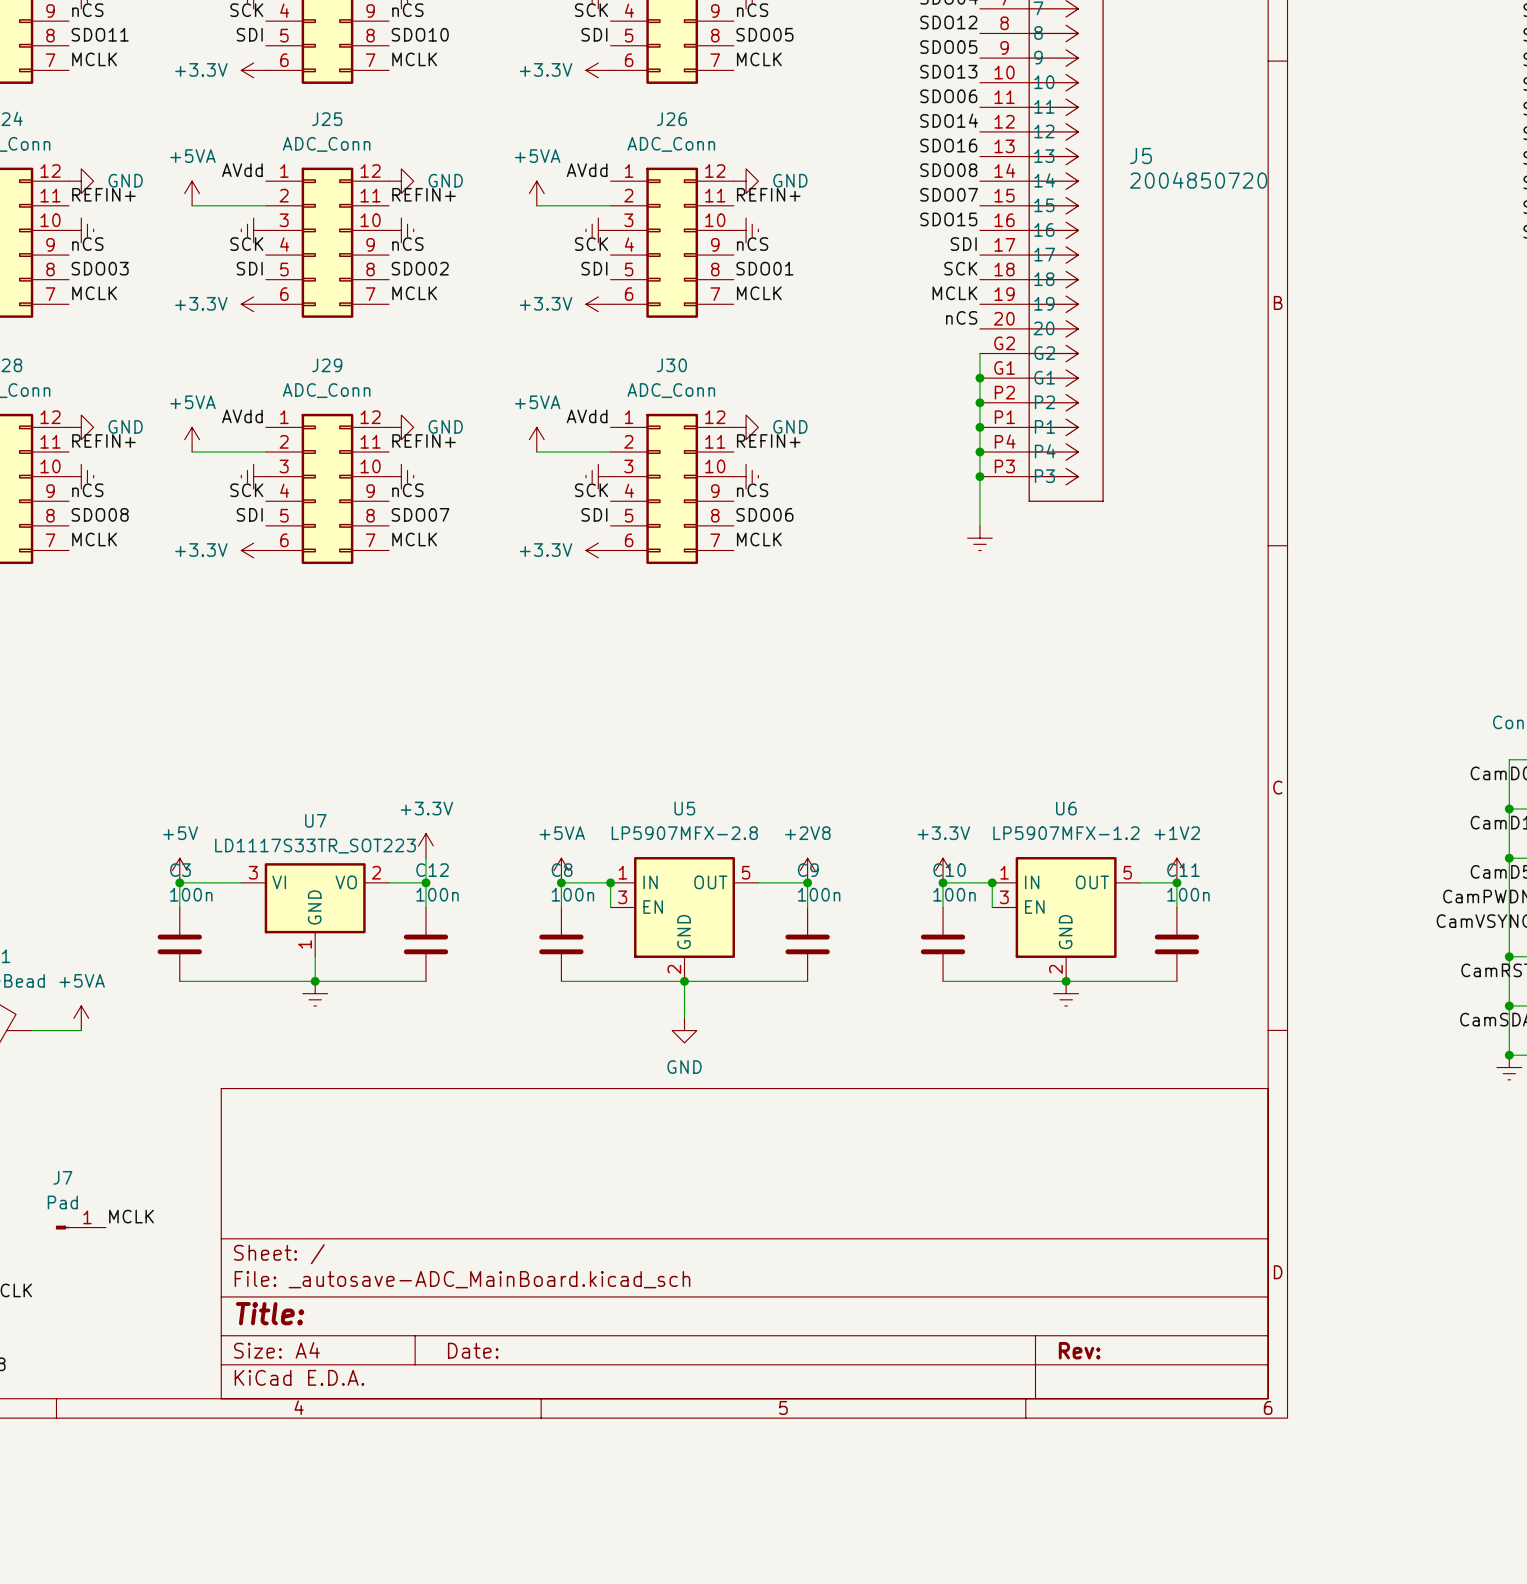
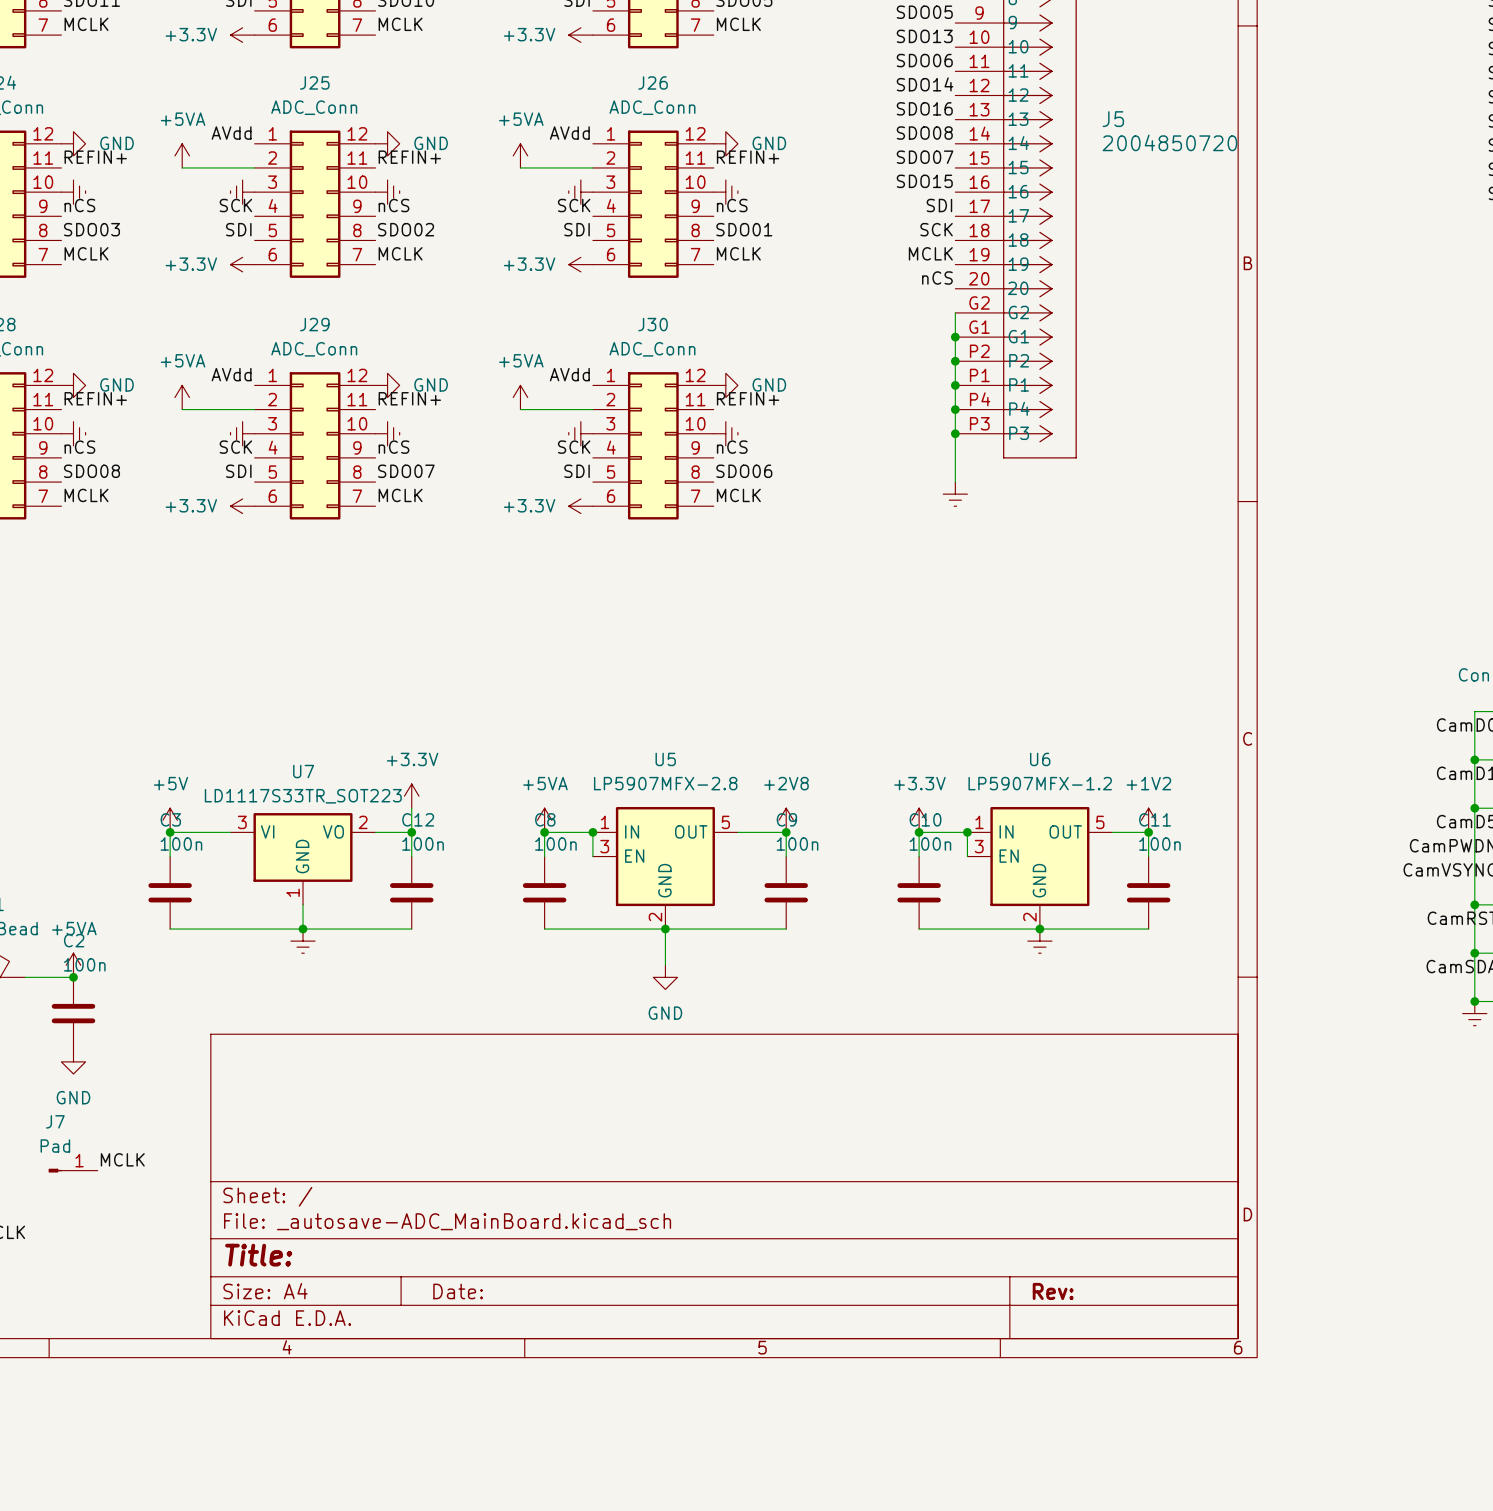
junction: none -> (73, 977)
C2: none -> 100n (73, 1013)
power symbol: none -> GND (73, 1061)

